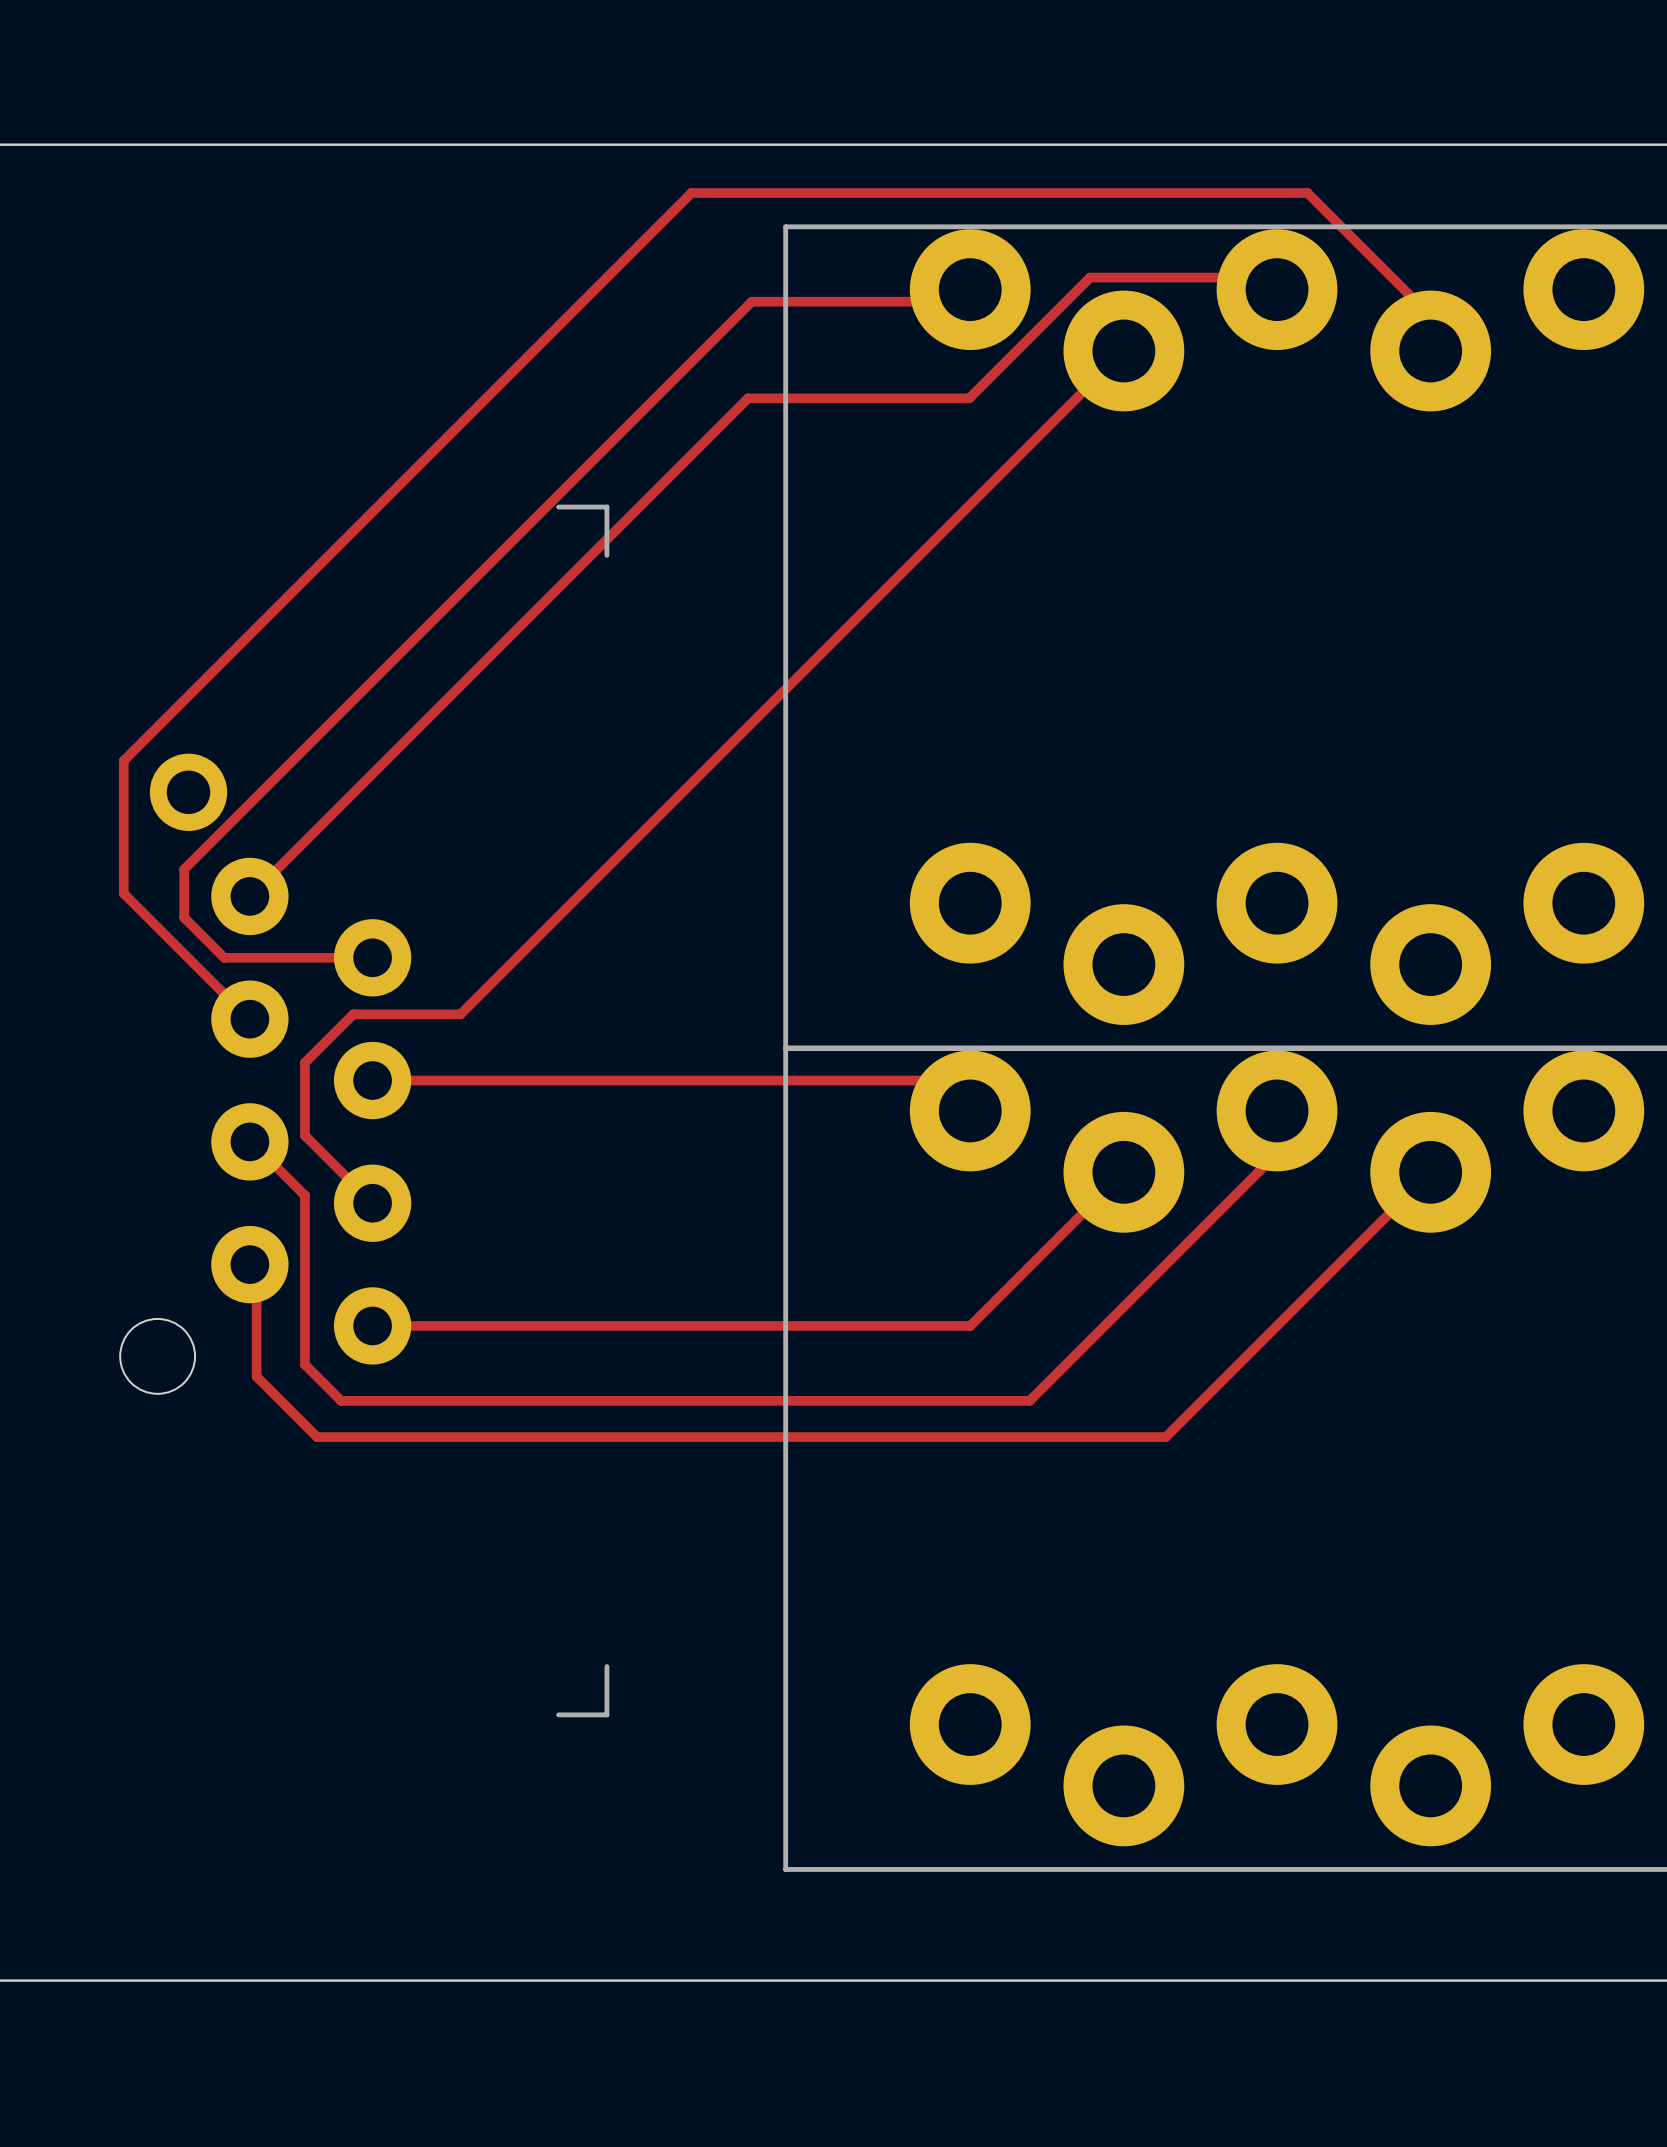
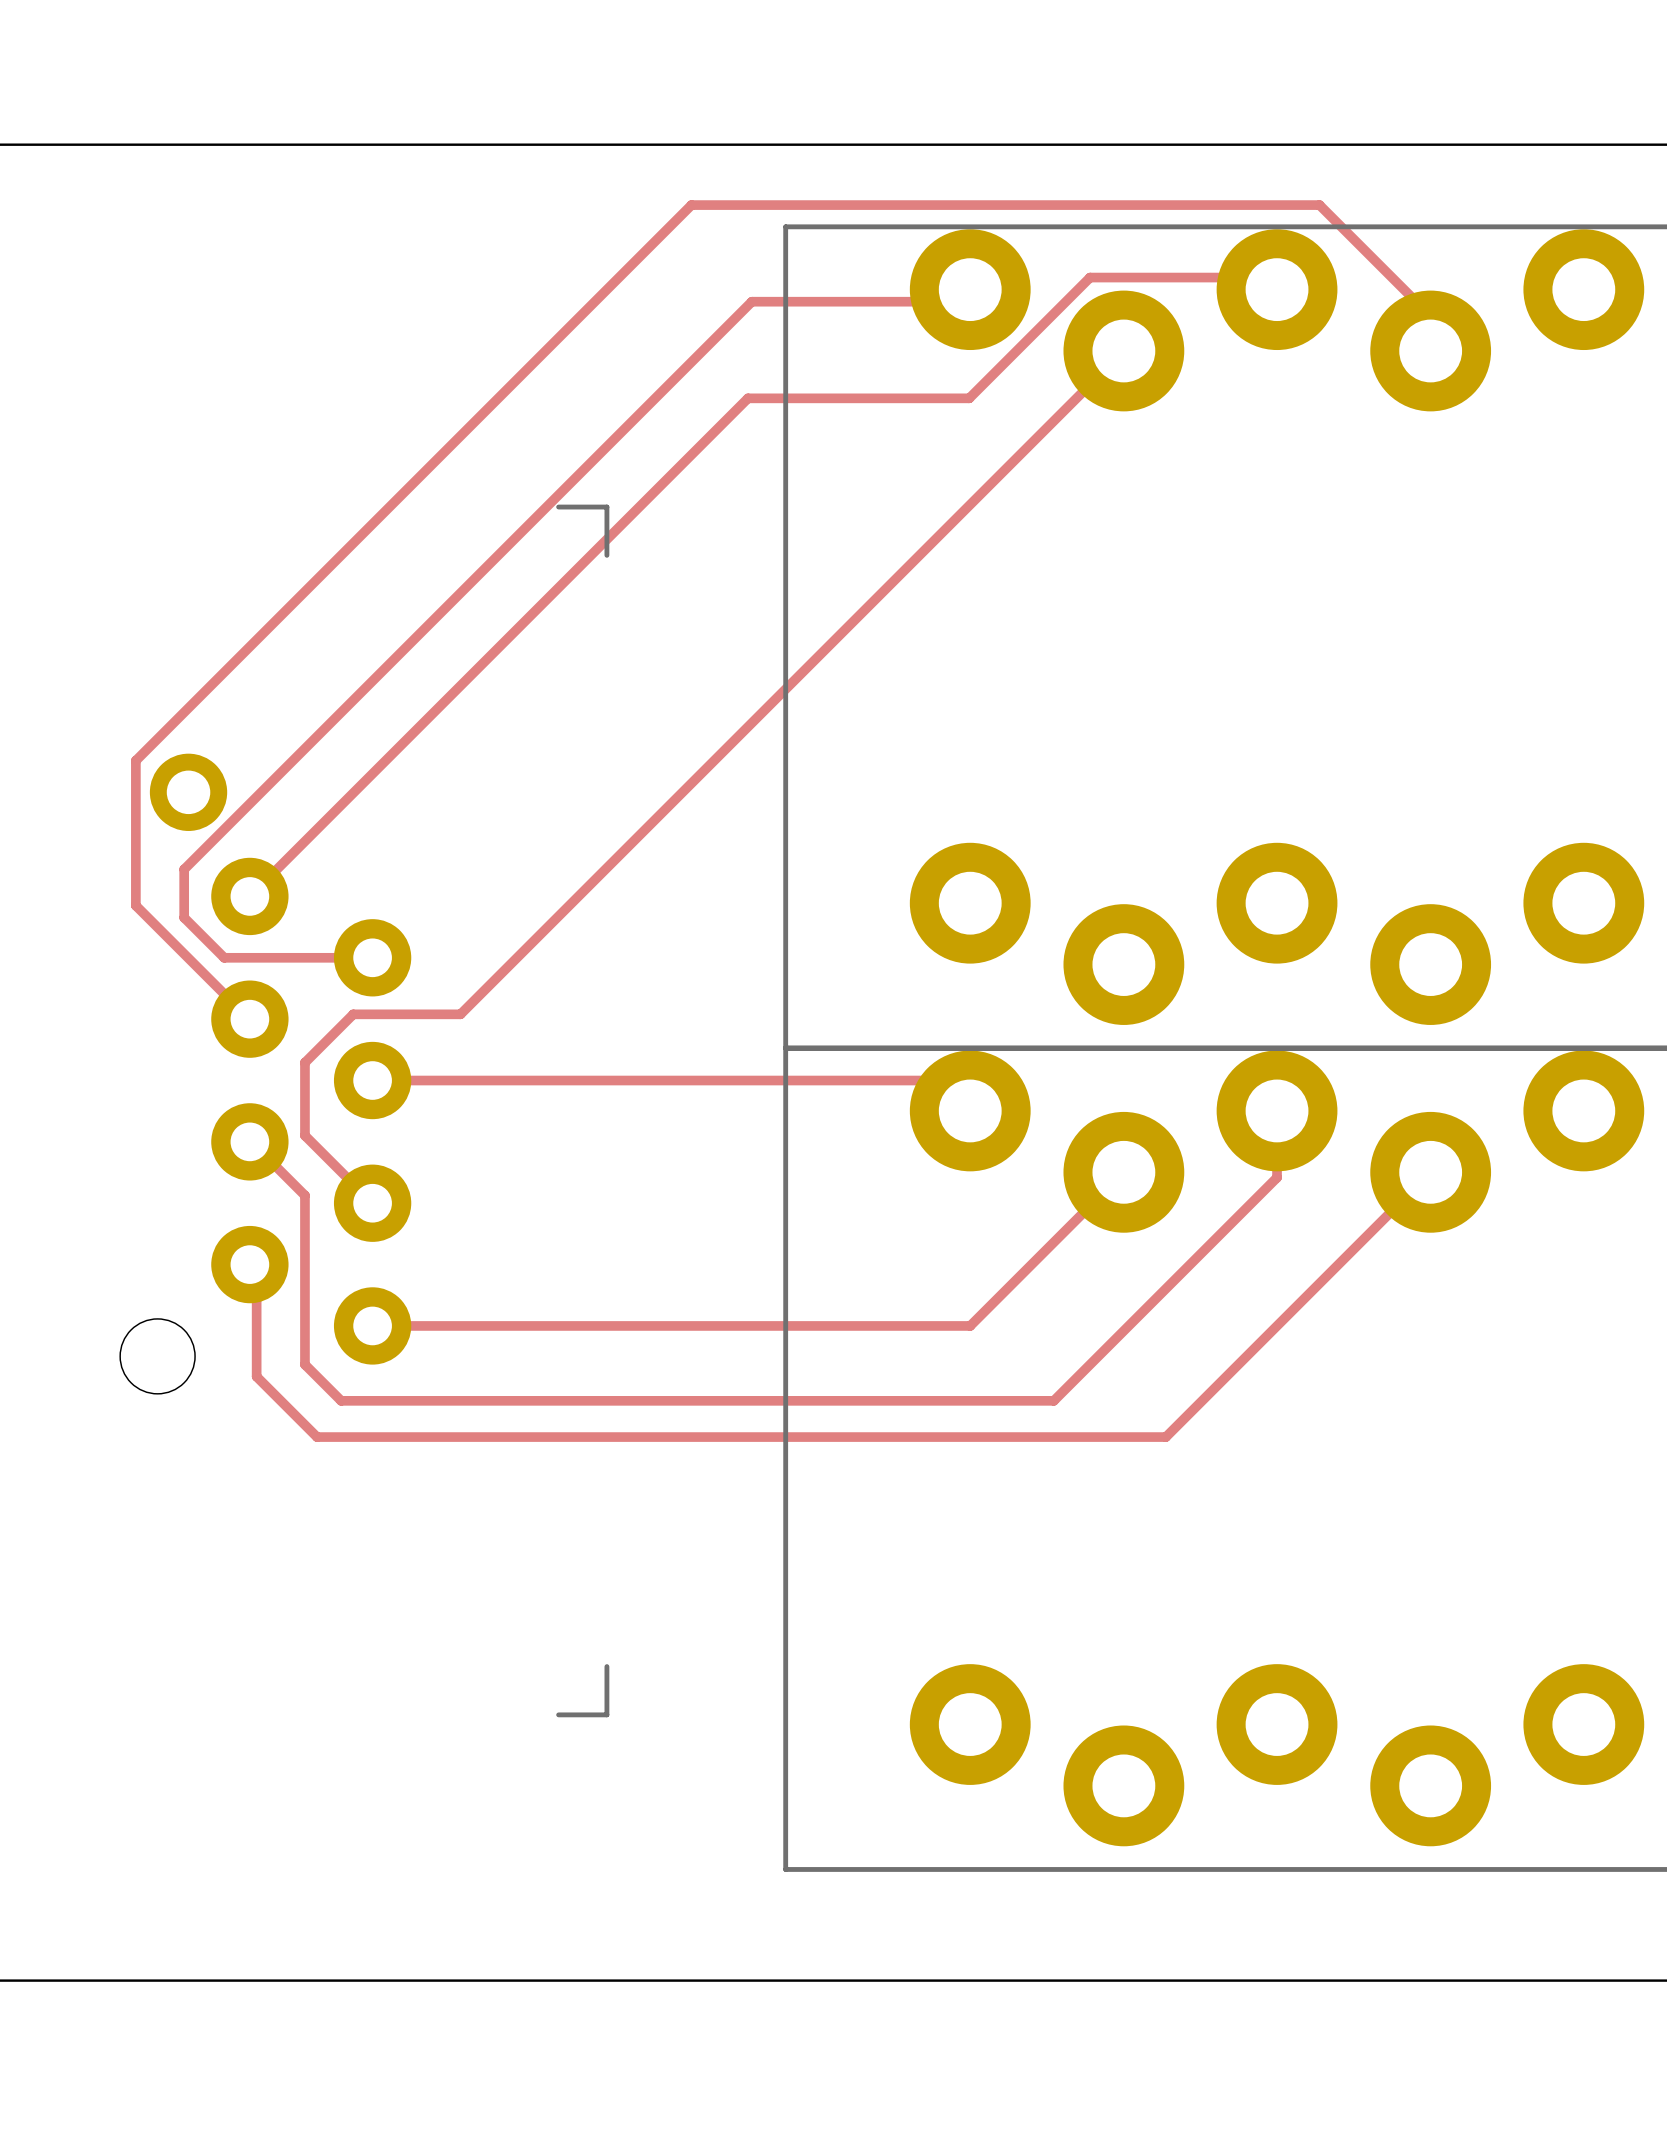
track: (1319, 205) (1307, 193) (691, 193) (123, 760) (123, 893) (135, 905) -> (1319, 205) (691, 205) (135, 760) (135, 905)
track: (1277, 1153) (1029, 1400) -> (1277, 1153) (1277, 1177) (1053, 1400) (1029, 1400)

